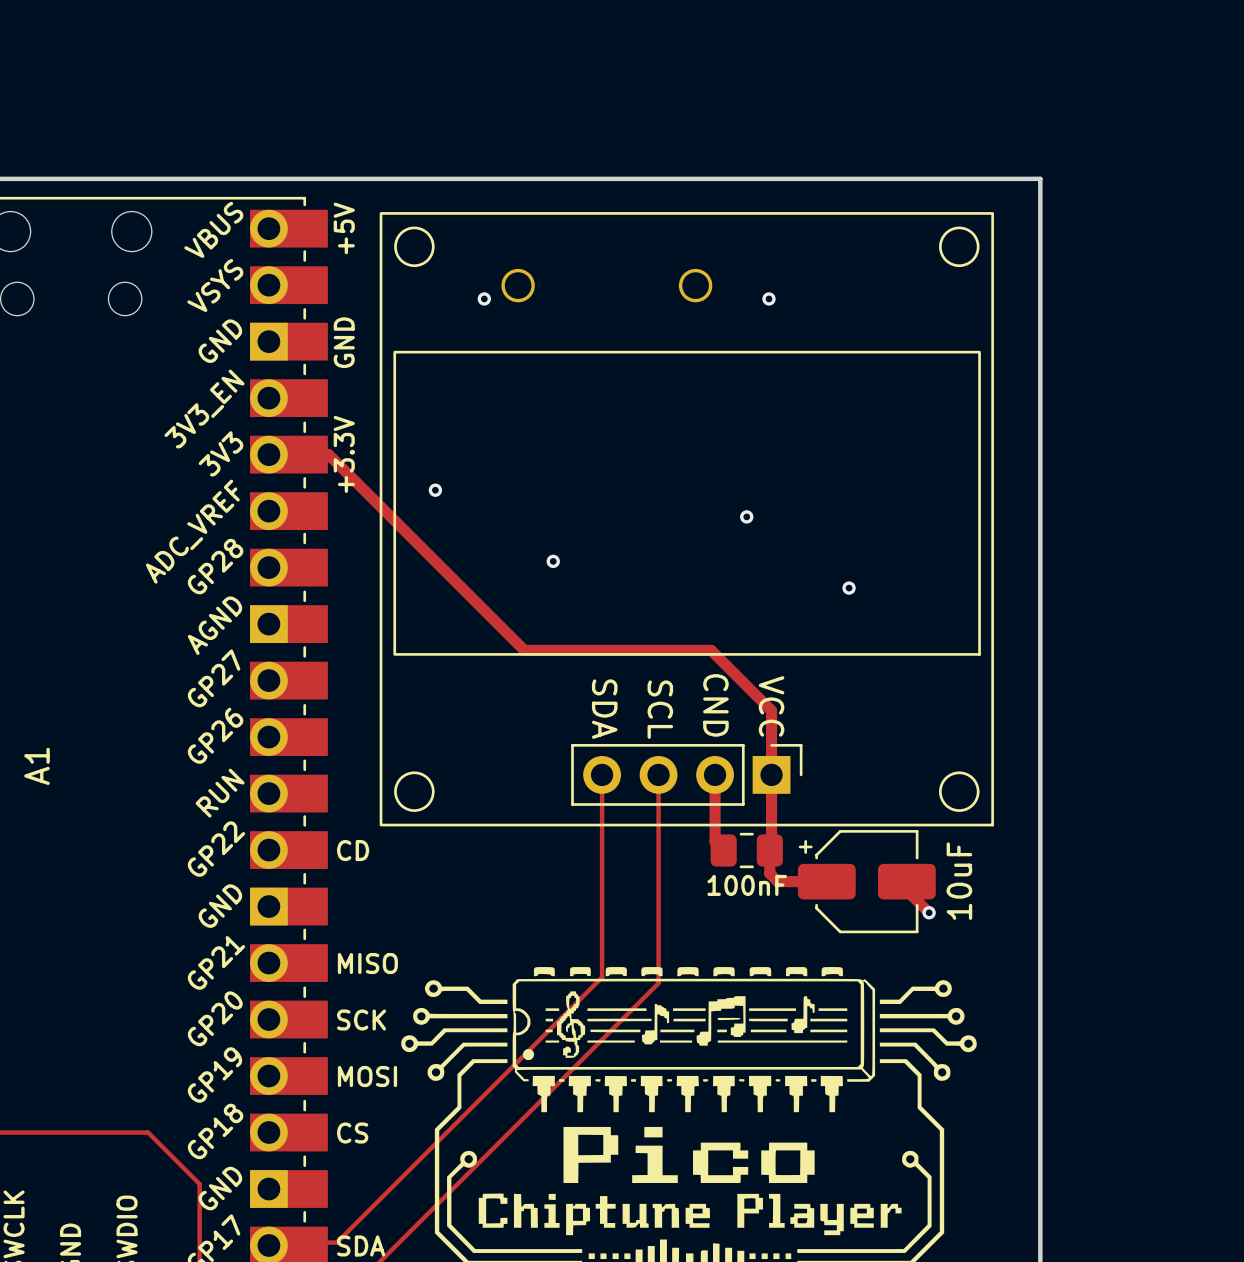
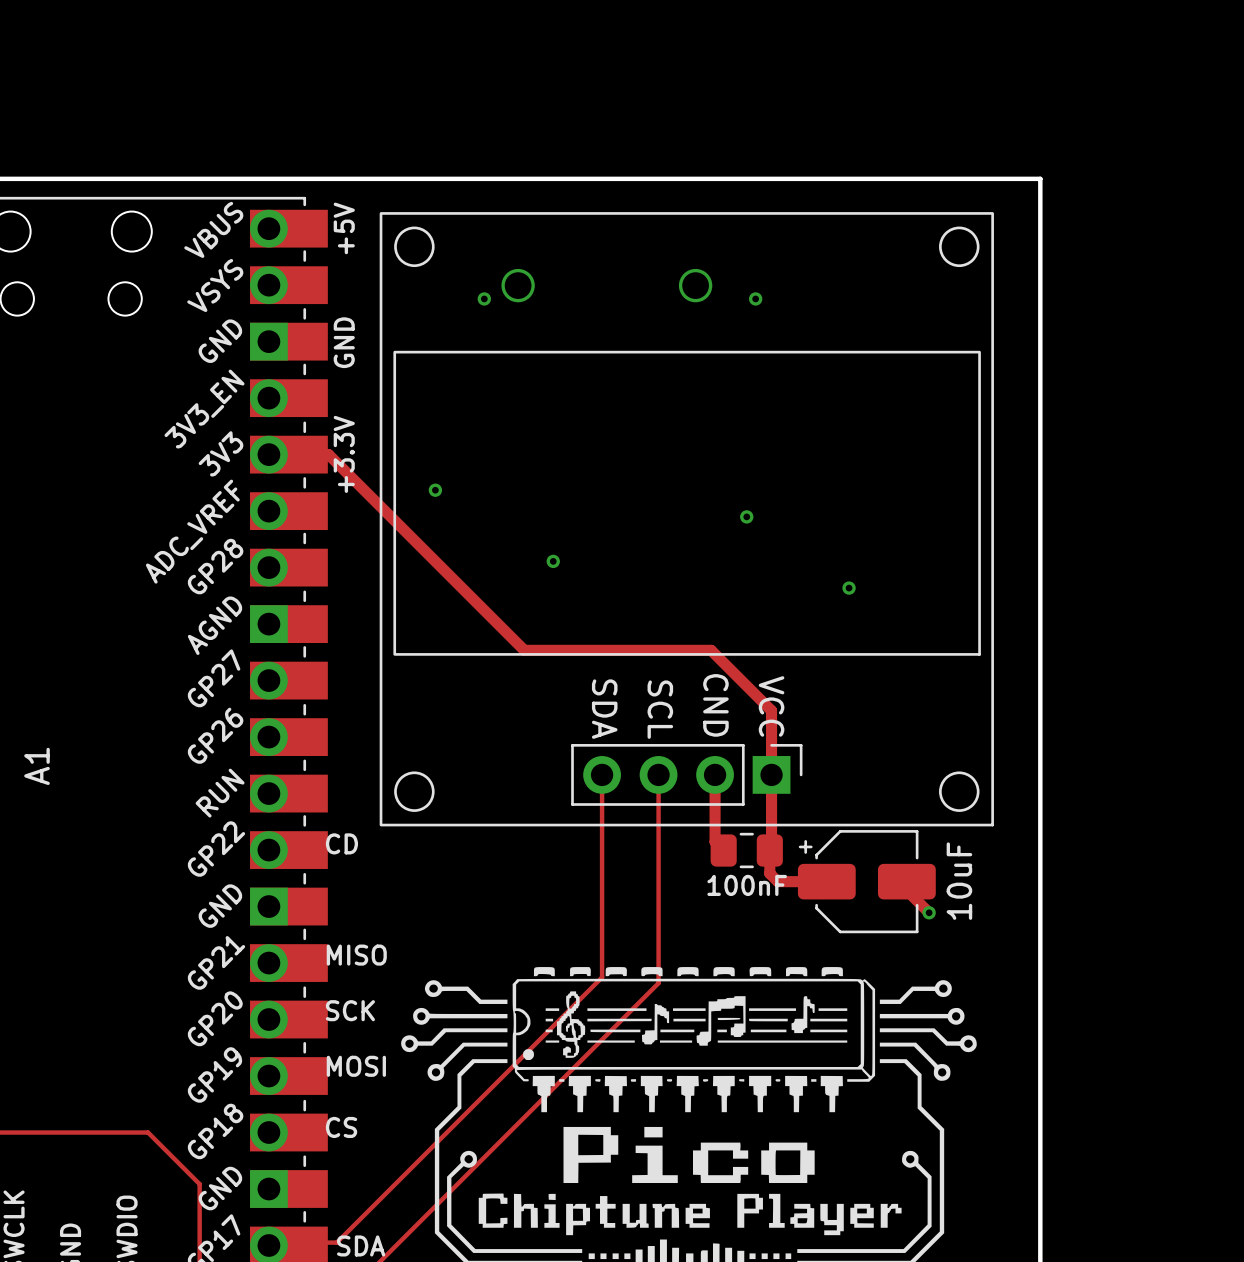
via position: (768, 298) -> (755, 298)
text position: CD (353, 850) -> CD (341, 843)
text position: MISO (367, 963) -> MISO (356, 955)
text position: SCK (361, 1020) -> SCK (350, 1010)
text position: MOSI (367, 1076) -> MOSI (356, 1066)
text position: CS (352, 1133) -> CS (341, 1127)

